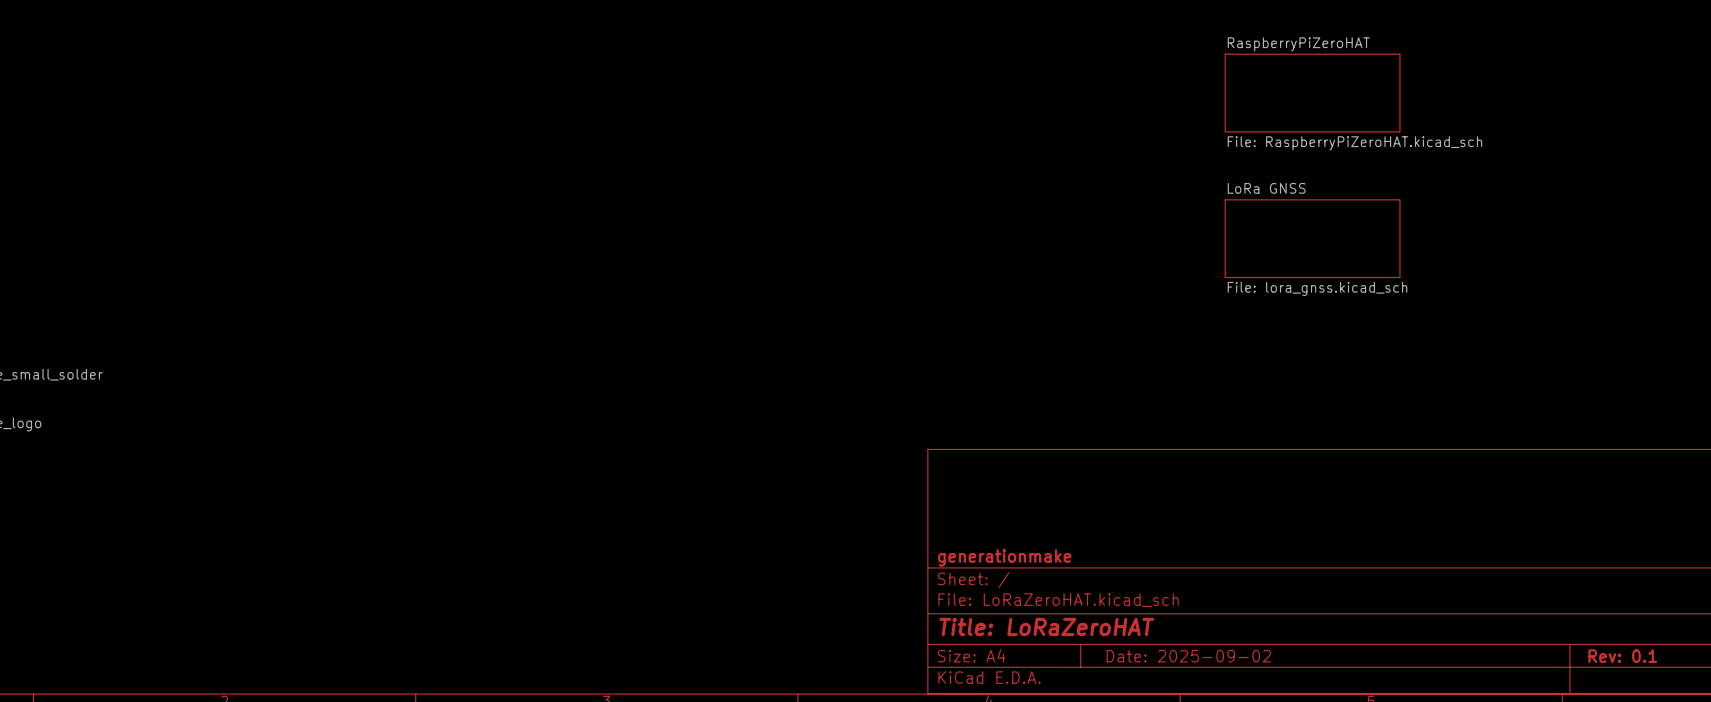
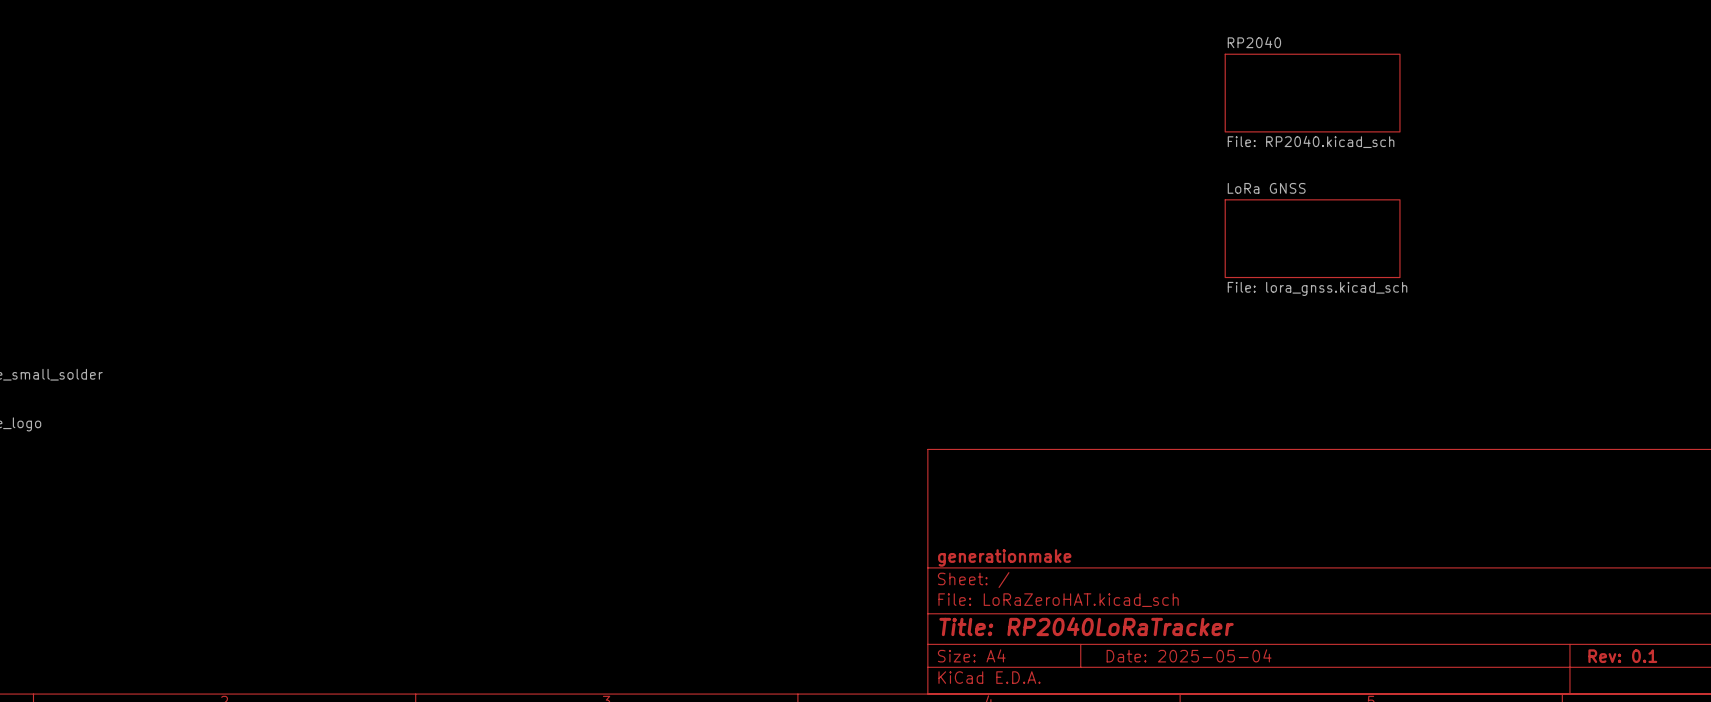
sheet RaspberryPiZeroHAT name: RaspberryPiZeroHAT (1298, 44) -> RP2040 (1254, 42)
sheet RaspberryPiZeroHAT value: File: RaspberryPiZeroHAT.kicad_sch (1354, 143) -> File: RP2040.kicad_sch (1311, 141)
title block: Title: LoRaZeroHAT (1046, 626) -> Title: RP2040LoRaTracker (1086, 626)
title block: Date: 2025-09-02 (1188, 656) -> Date: 2025-05-04 (1189, 655)

